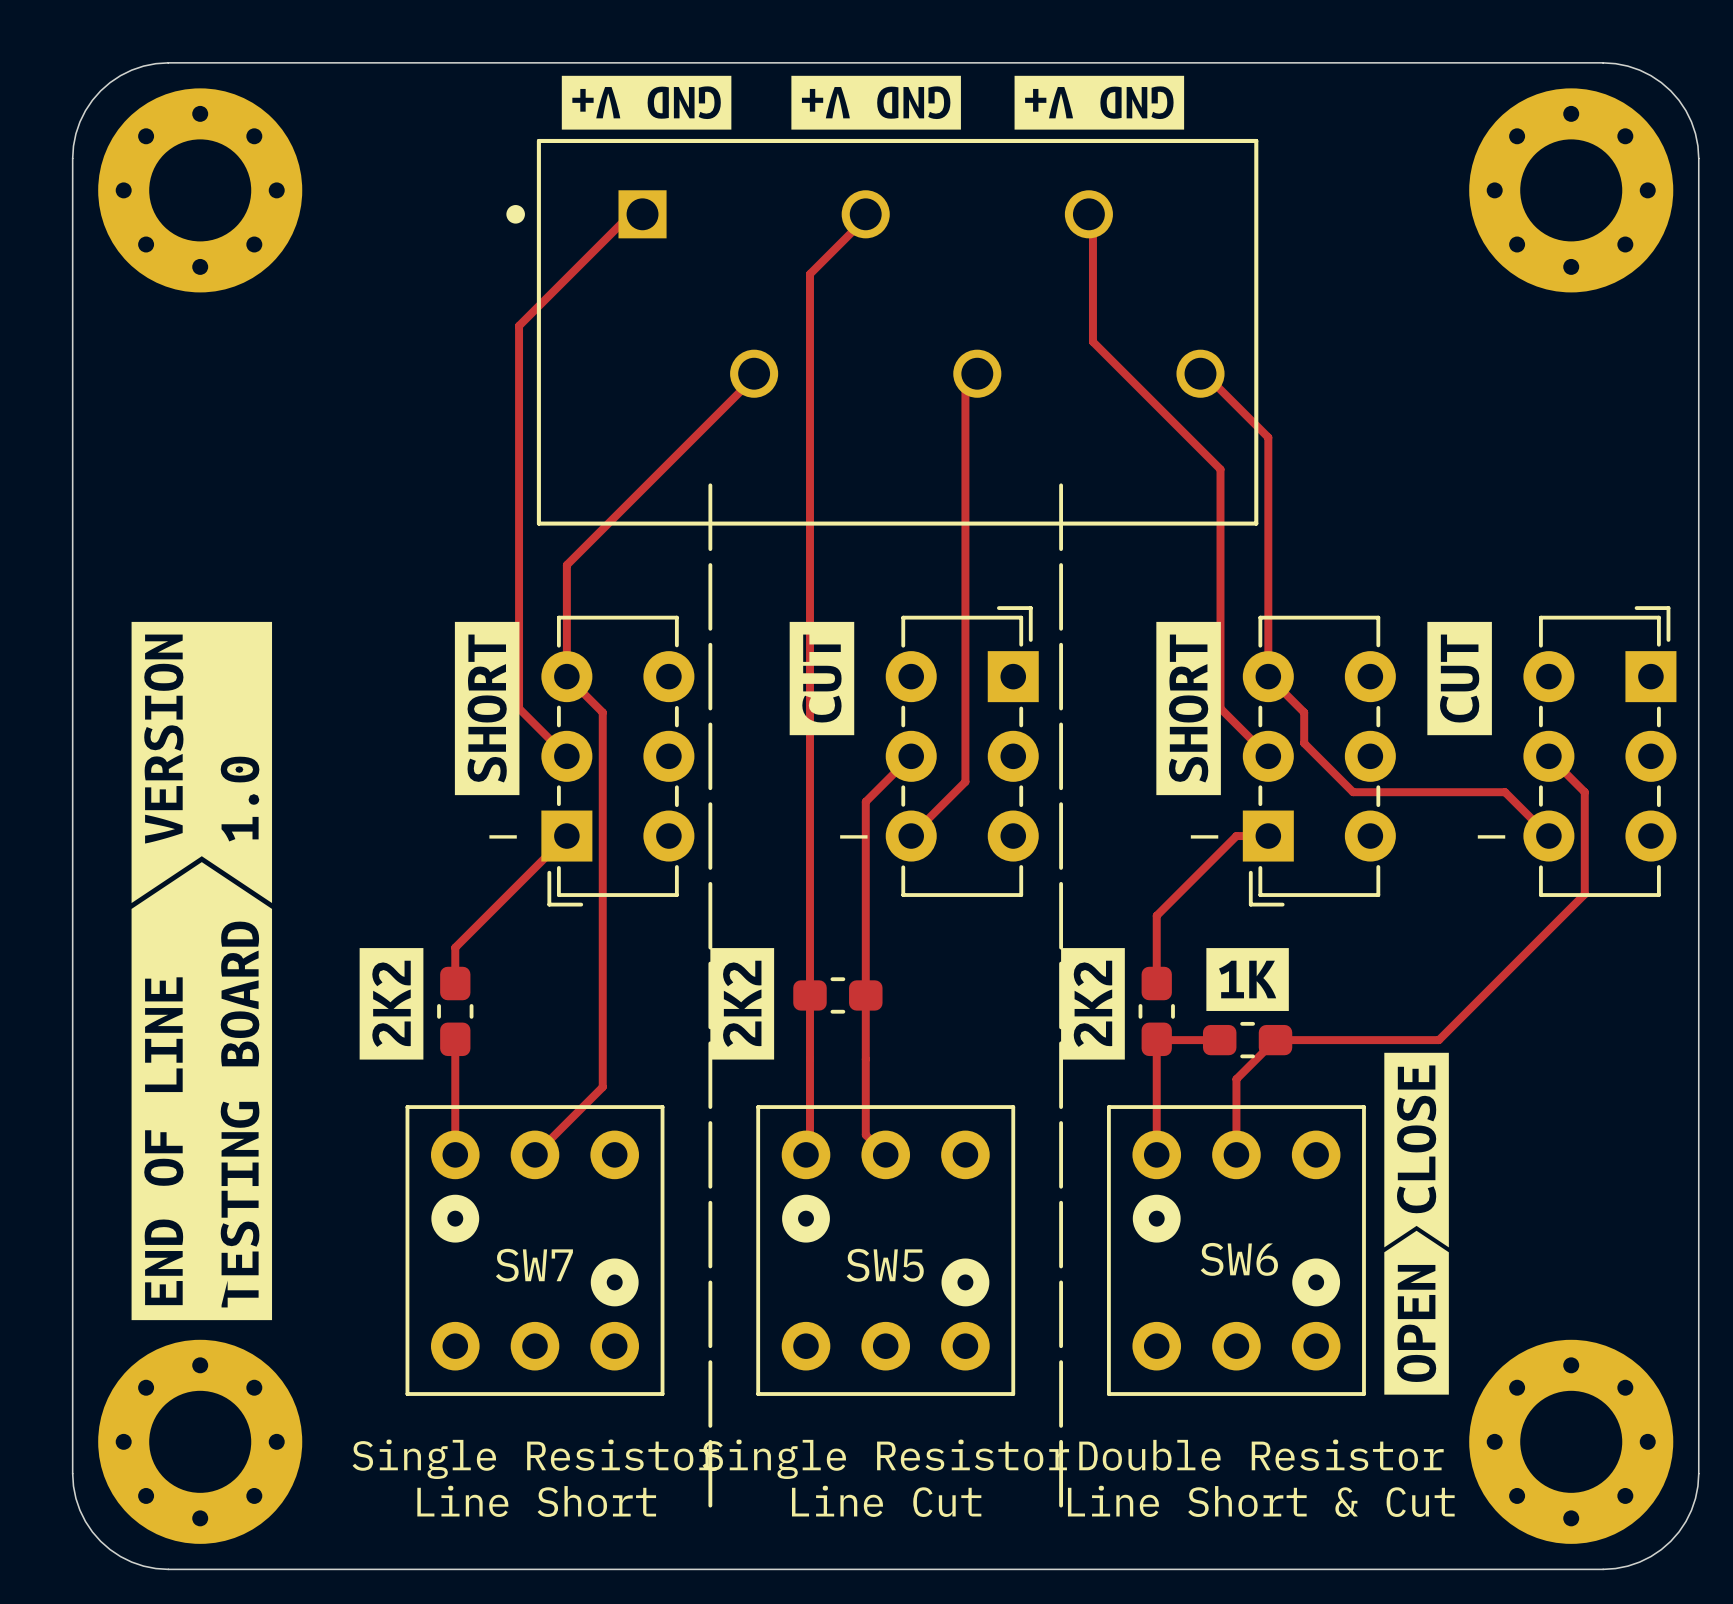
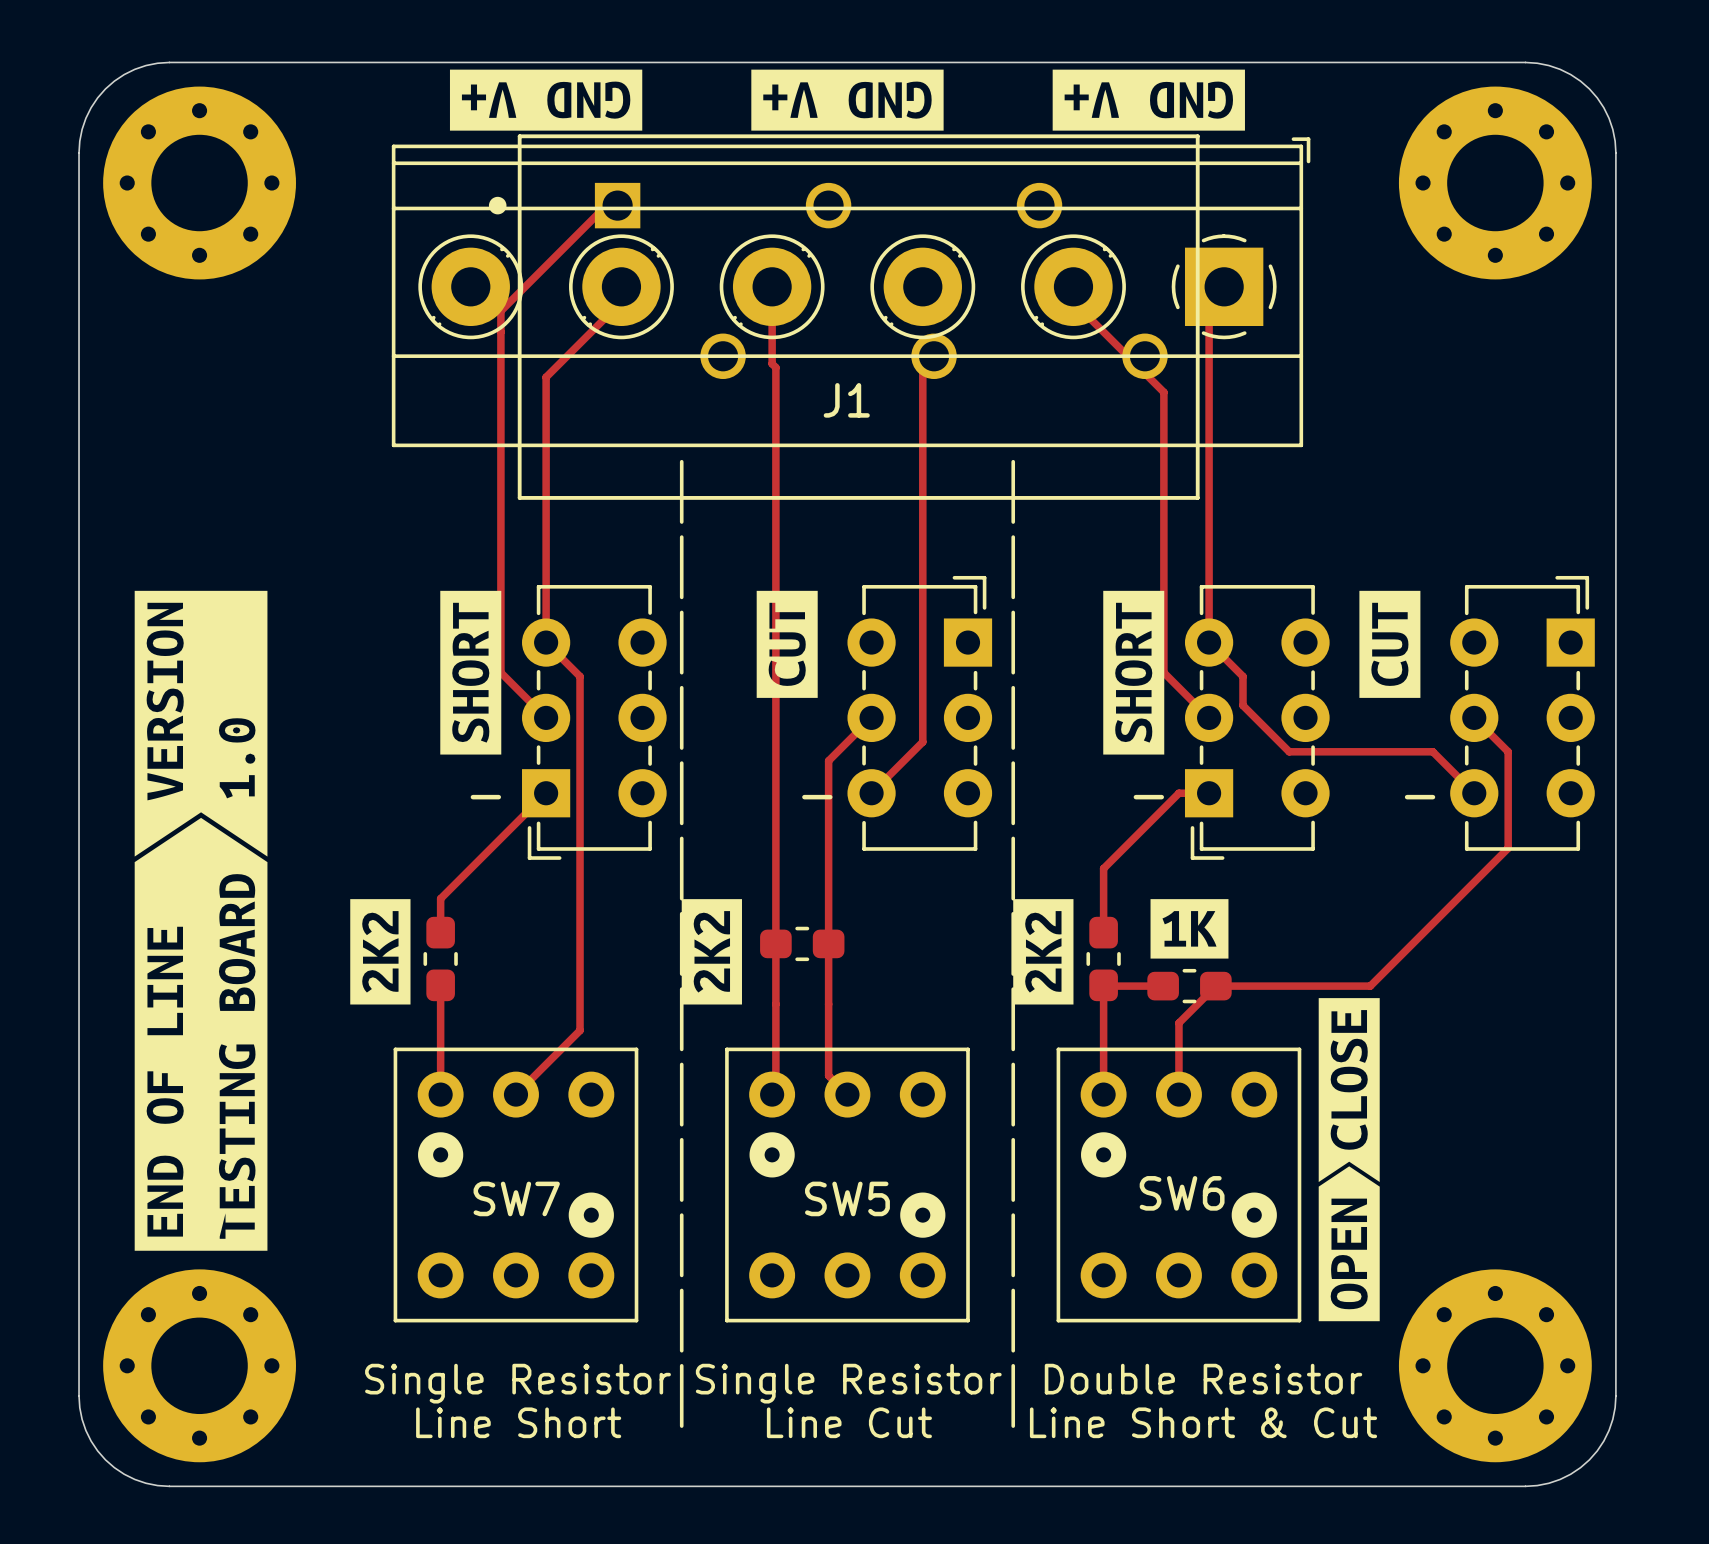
drawing: none -> [449, 69, 643, 131]
drawing: none -> [1052, 69, 1245, 131]
drawing: [561, 75, 732, 130] -> none
drawing shape: [791, 75, 961, 130] -> [751, 69, 944, 131]
drawing: [1014, 75, 1185, 130] -> none
track: (869, 214) (809, 274) (809, 385) -> (772, 301) (772, 363) (775, 367)
track: (1092, 214) (1092, 341) (1220, 469) -> (1073, 301) (1163, 392) (1163, 446)
J1: none -> (851, 292)
track: (758, 373) (566, 565) -> (621, 301) (546, 377) (546, 537)
track: (1204, 373) (1268, 437) -> (1224, 301) (1209, 316) (1209, 416)

